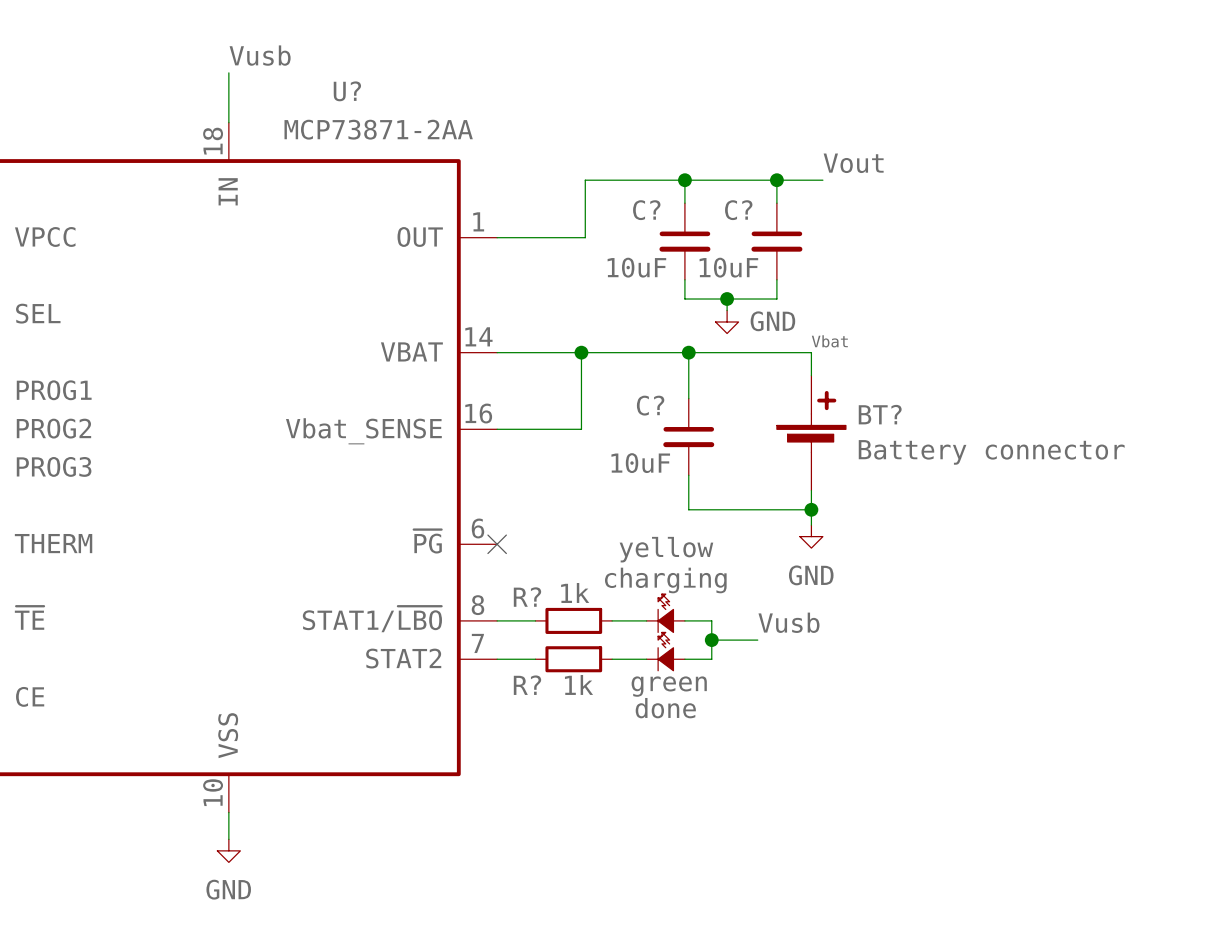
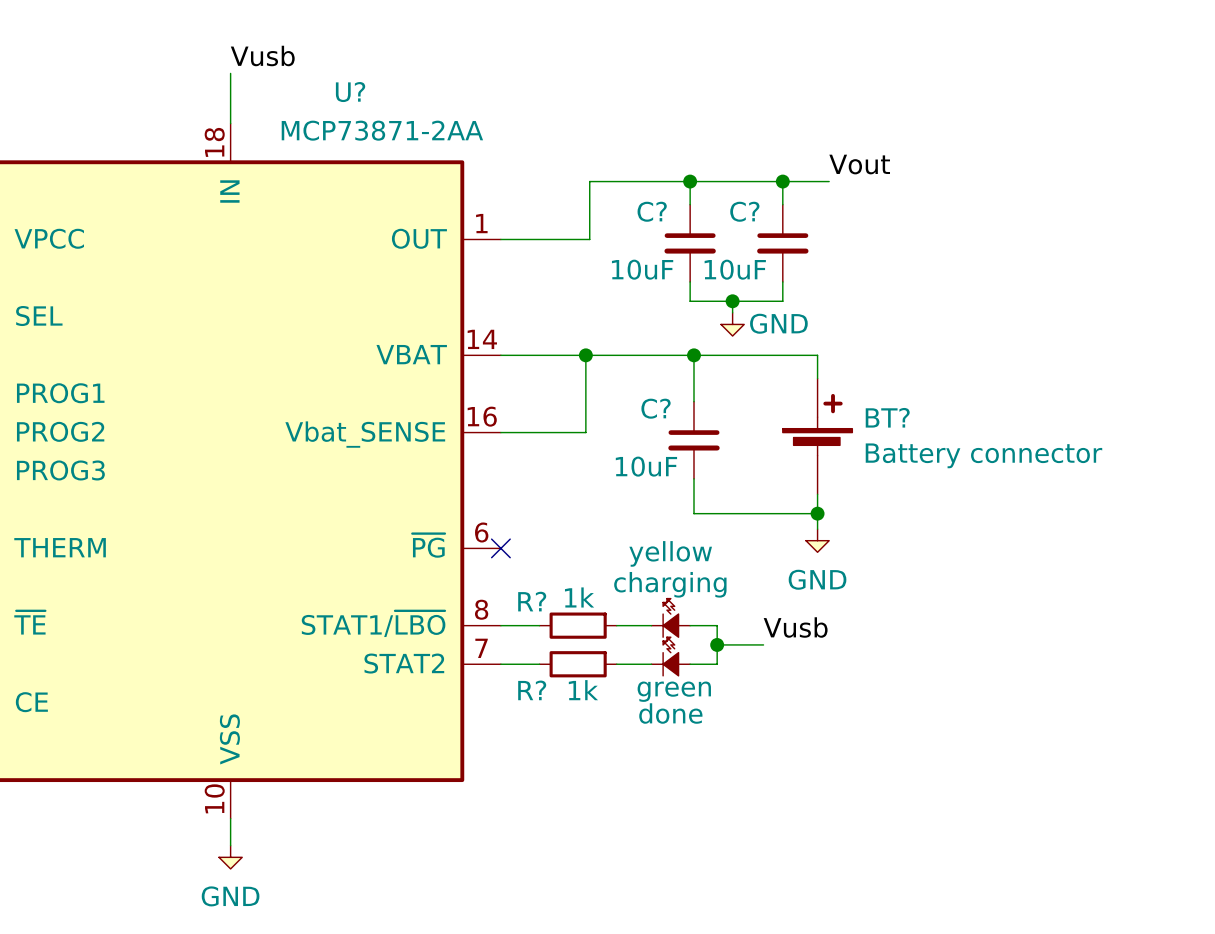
label: Vbat (829, 341) -> none

